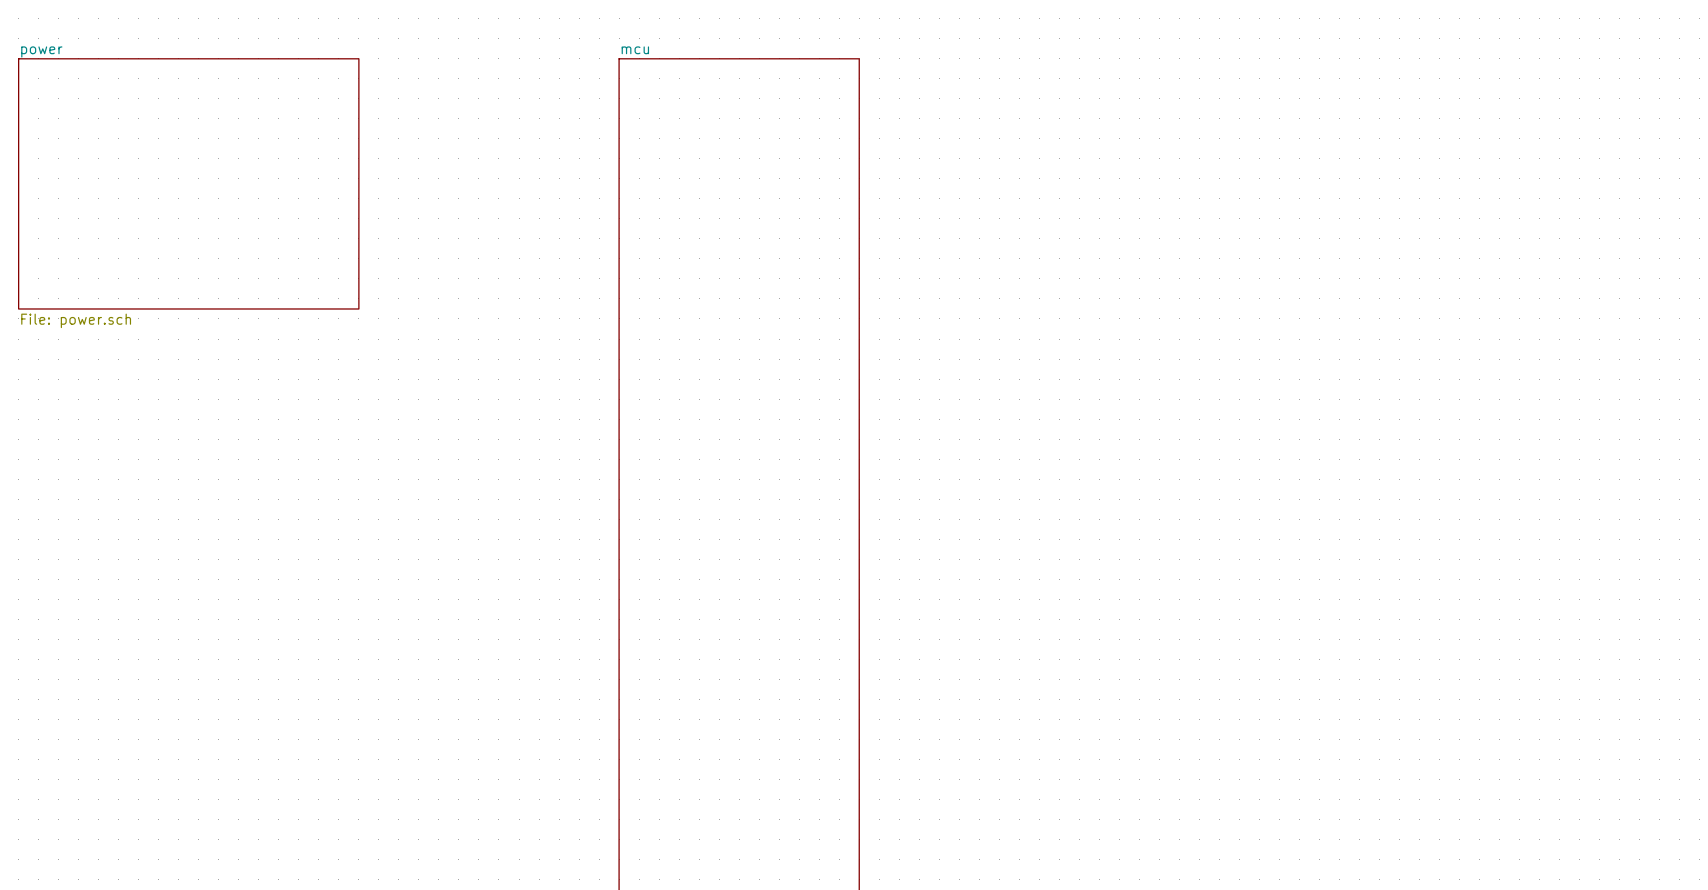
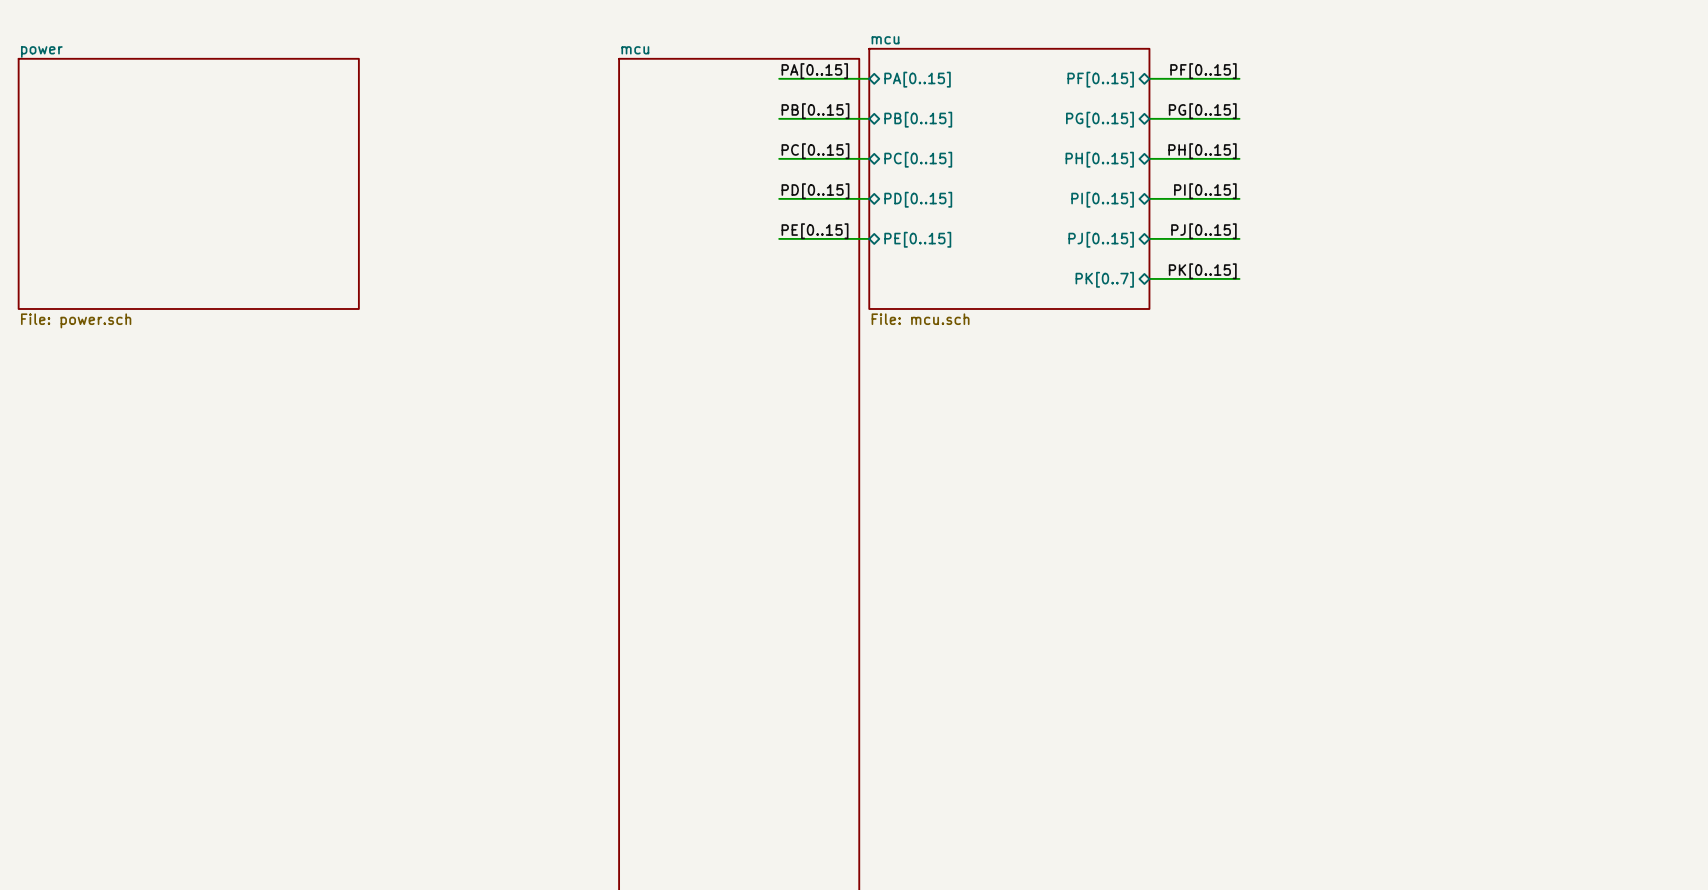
label: none -> PA[0..15] (814, 71)
label: none -> PF[0..15] (1203, 71)
wire: none -> (779, 78) (869, 78)
wire: none -> (1149, 78) (1239, 78)
sheet pin: none -> PA[0..15] (917, 79)
sheet pin: none -> PF[0..15] (1100, 79)
label: none -> PB[0..15] (815, 111)
label: none -> PG[0..15] (1202, 111)
wire: none -> (779, 118) (869, 118)
wire: none -> (1149, 118) (1239, 118)
sheet pin: none -> PB[0..15] (918, 119)
sheet pin: none -> PG[0..15] (1099, 119)
label: none -> PC[0..15] (815, 151)
label: none -> PH[0..15] (1202, 151)
wire: none -> (779, 158) (869, 158)
wire: none -> (1149, 158) (1239, 158)
sheet pin: none -> PC[0..15] (918, 159)
sheet pin: none -> PH[0..15] (1099, 159)
sheet mcu: none -> File: mcu.sch (1009, 178)
label: none -> PD[0..15] (815, 191)
label: none -> PI[0..15] (1205, 191)
wire: none -> (779, 198) (869, 198)
wire: none -> (1149, 198) (1239, 198)
sheet pin: none -> PD[0..15] (918, 199)
sheet pin: none -> PI[0..15] (1102, 199)
label: none -> PE[0..15] (815, 231)
label: none -> PJ[0..15] (1203, 231)
wire: none -> (779, 238) (869, 238)
wire: none -> (1149, 238) (1239, 238)
sheet pin: none -> PE[0..15] (917, 239)
sheet pin: none -> PJ[0..15] (1101, 239)
label: none -> PK[0..15] (1202, 271)
wire: none -> (1149, 278) (1239, 278)
sheet pin: none -> PK[0..7] (1104, 279)

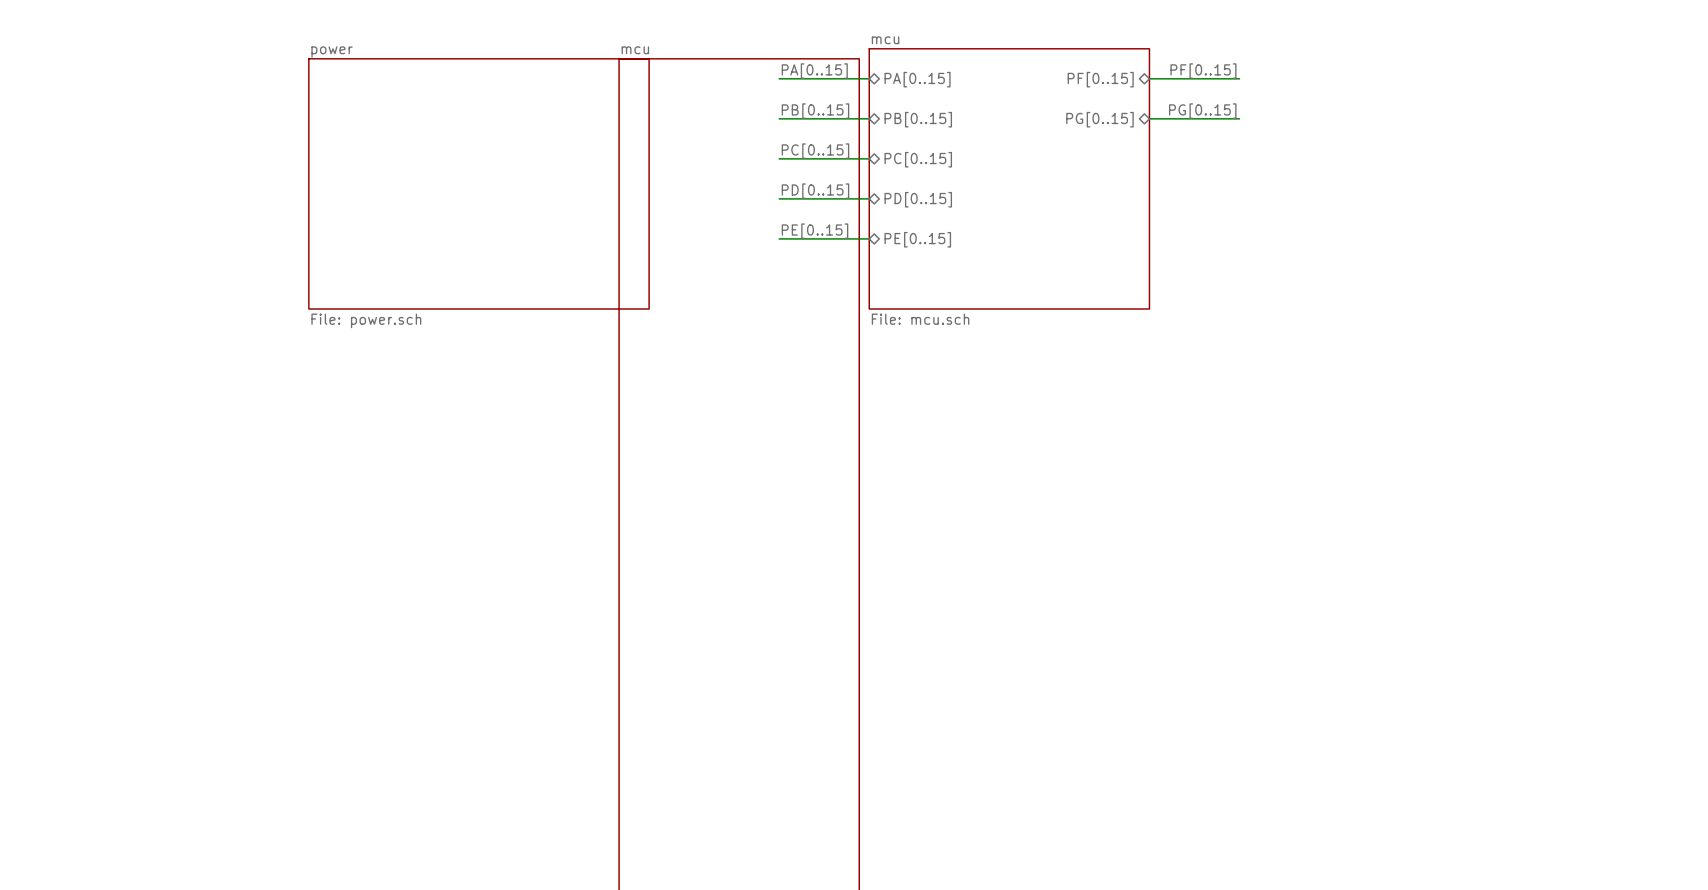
label: PH[0..15] (1202, 151) -> none
wire: (1149, 158) (1239, 158) -> none
sheet pin: PH[0..15] (1099, 159) -> none
sheet power: File: power.sch (188, 183) -> none
sheet power: none -> File: power.sch (478, 183)
label: PI[0..15] (1205, 191) -> none
wire: (1149, 198) (1239, 198) -> none
sheet pin: PI[0..15] (1102, 199) -> none
label: PJ[0..15] (1203, 231) -> none
wire: (1149, 238) (1239, 238) -> none
sheet pin: PJ[0..15] (1101, 239) -> none
label: PK[0..15] (1202, 271) -> none
wire: (1149, 278) (1239, 278) -> none
sheet pin: PK[0..7] (1104, 279) -> none

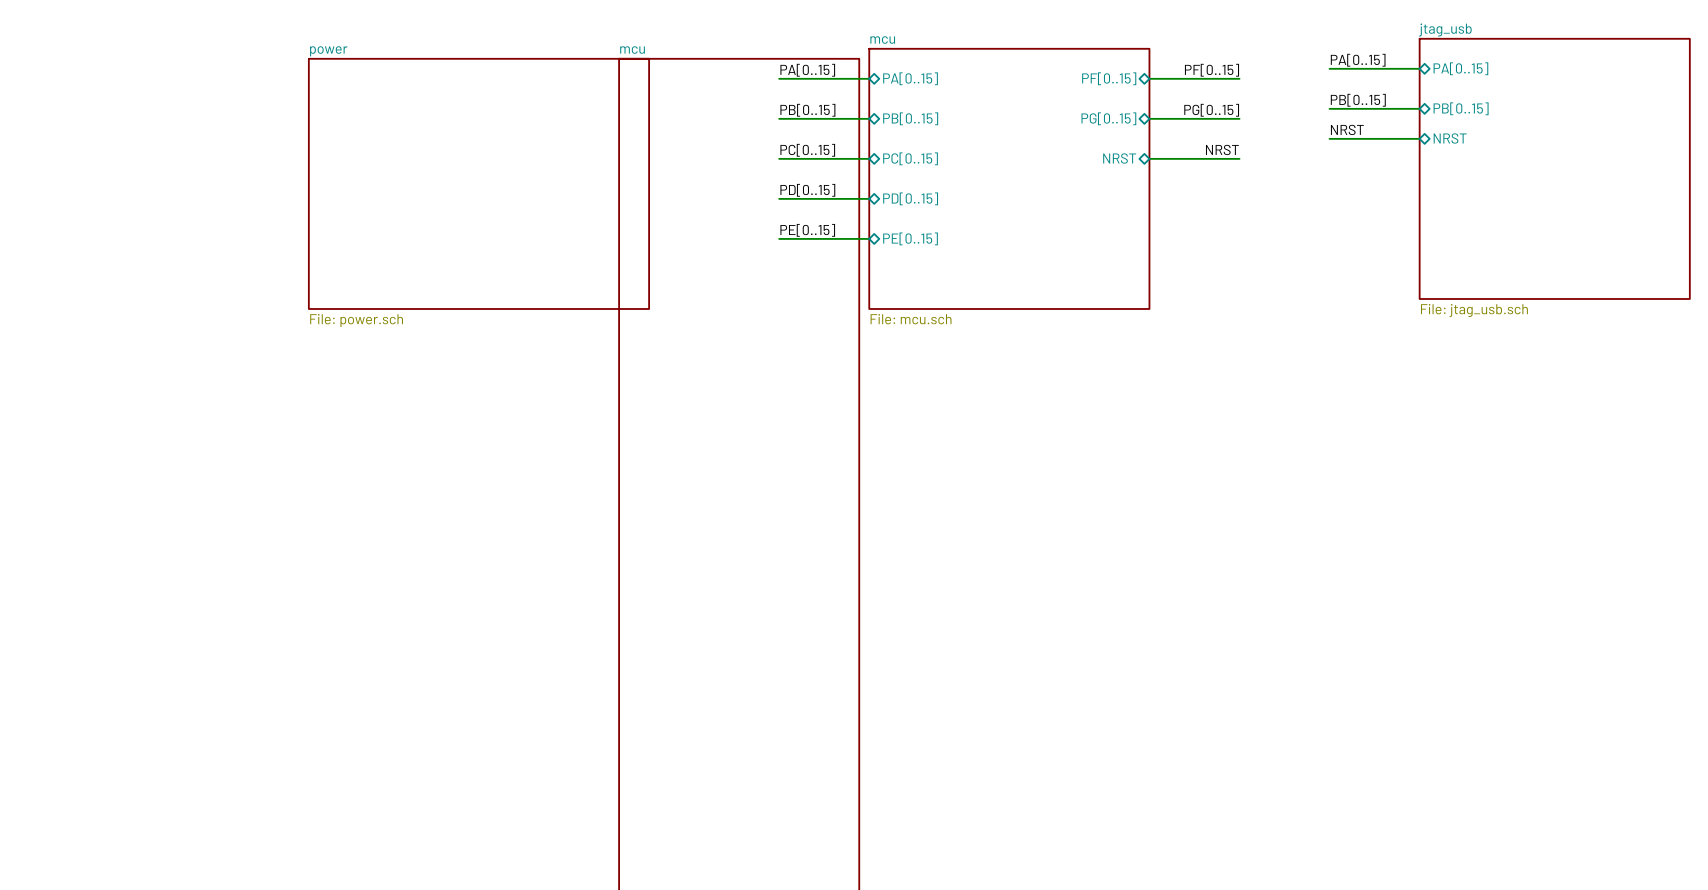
label: none -> PA[0..15] (1358, 60)
wire: none -> (1329, 68) (1419, 68)
sheet pin: none -> PA[0..15] (1460, 68)
label: none -> PB[0..15] (1358, 100)
wire: none -> (1329, 108) (1419, 108)
sheet pin: none -> PB[0..15] (1461, 108)
label: none -> NRST (1347, 129)
wire: none -> (1329, 138) (1419, 138)
sheet pin: none -> NRST (1450, 138)
label: none -> NRST (1222, 149)
sheet pin: none -> NRST (1119, 158)
wire: none -> (1149, 158) (1239, 158)
sheet jtag_usb: none -> File: jtag_usb.sch (1554, 168)

